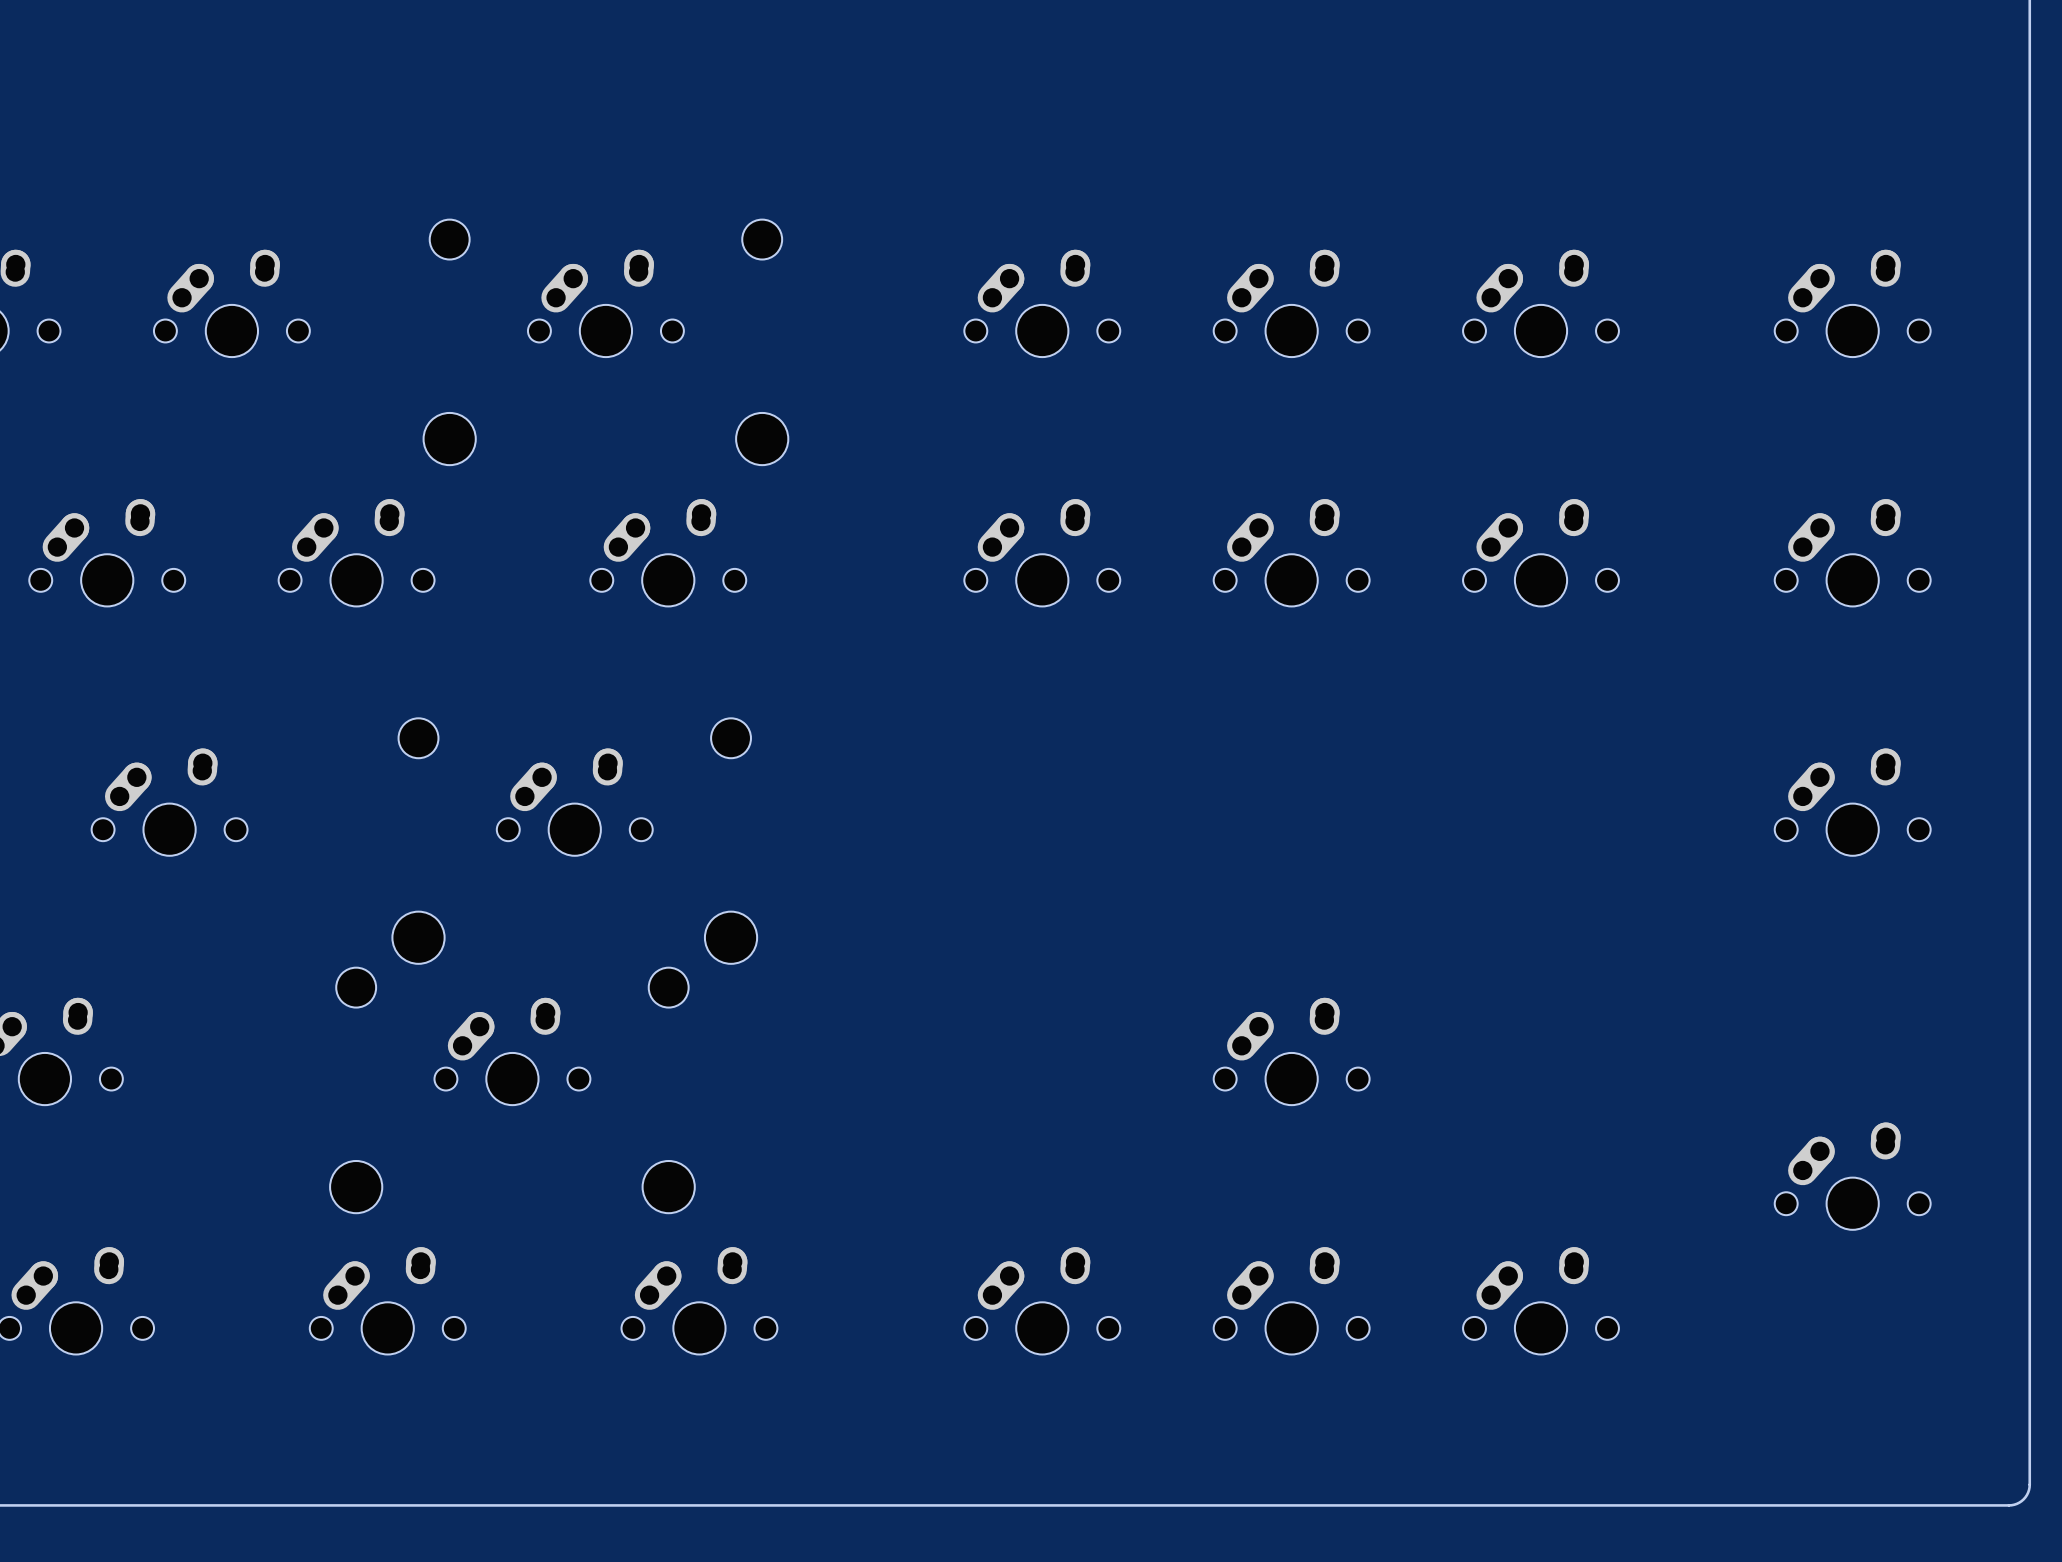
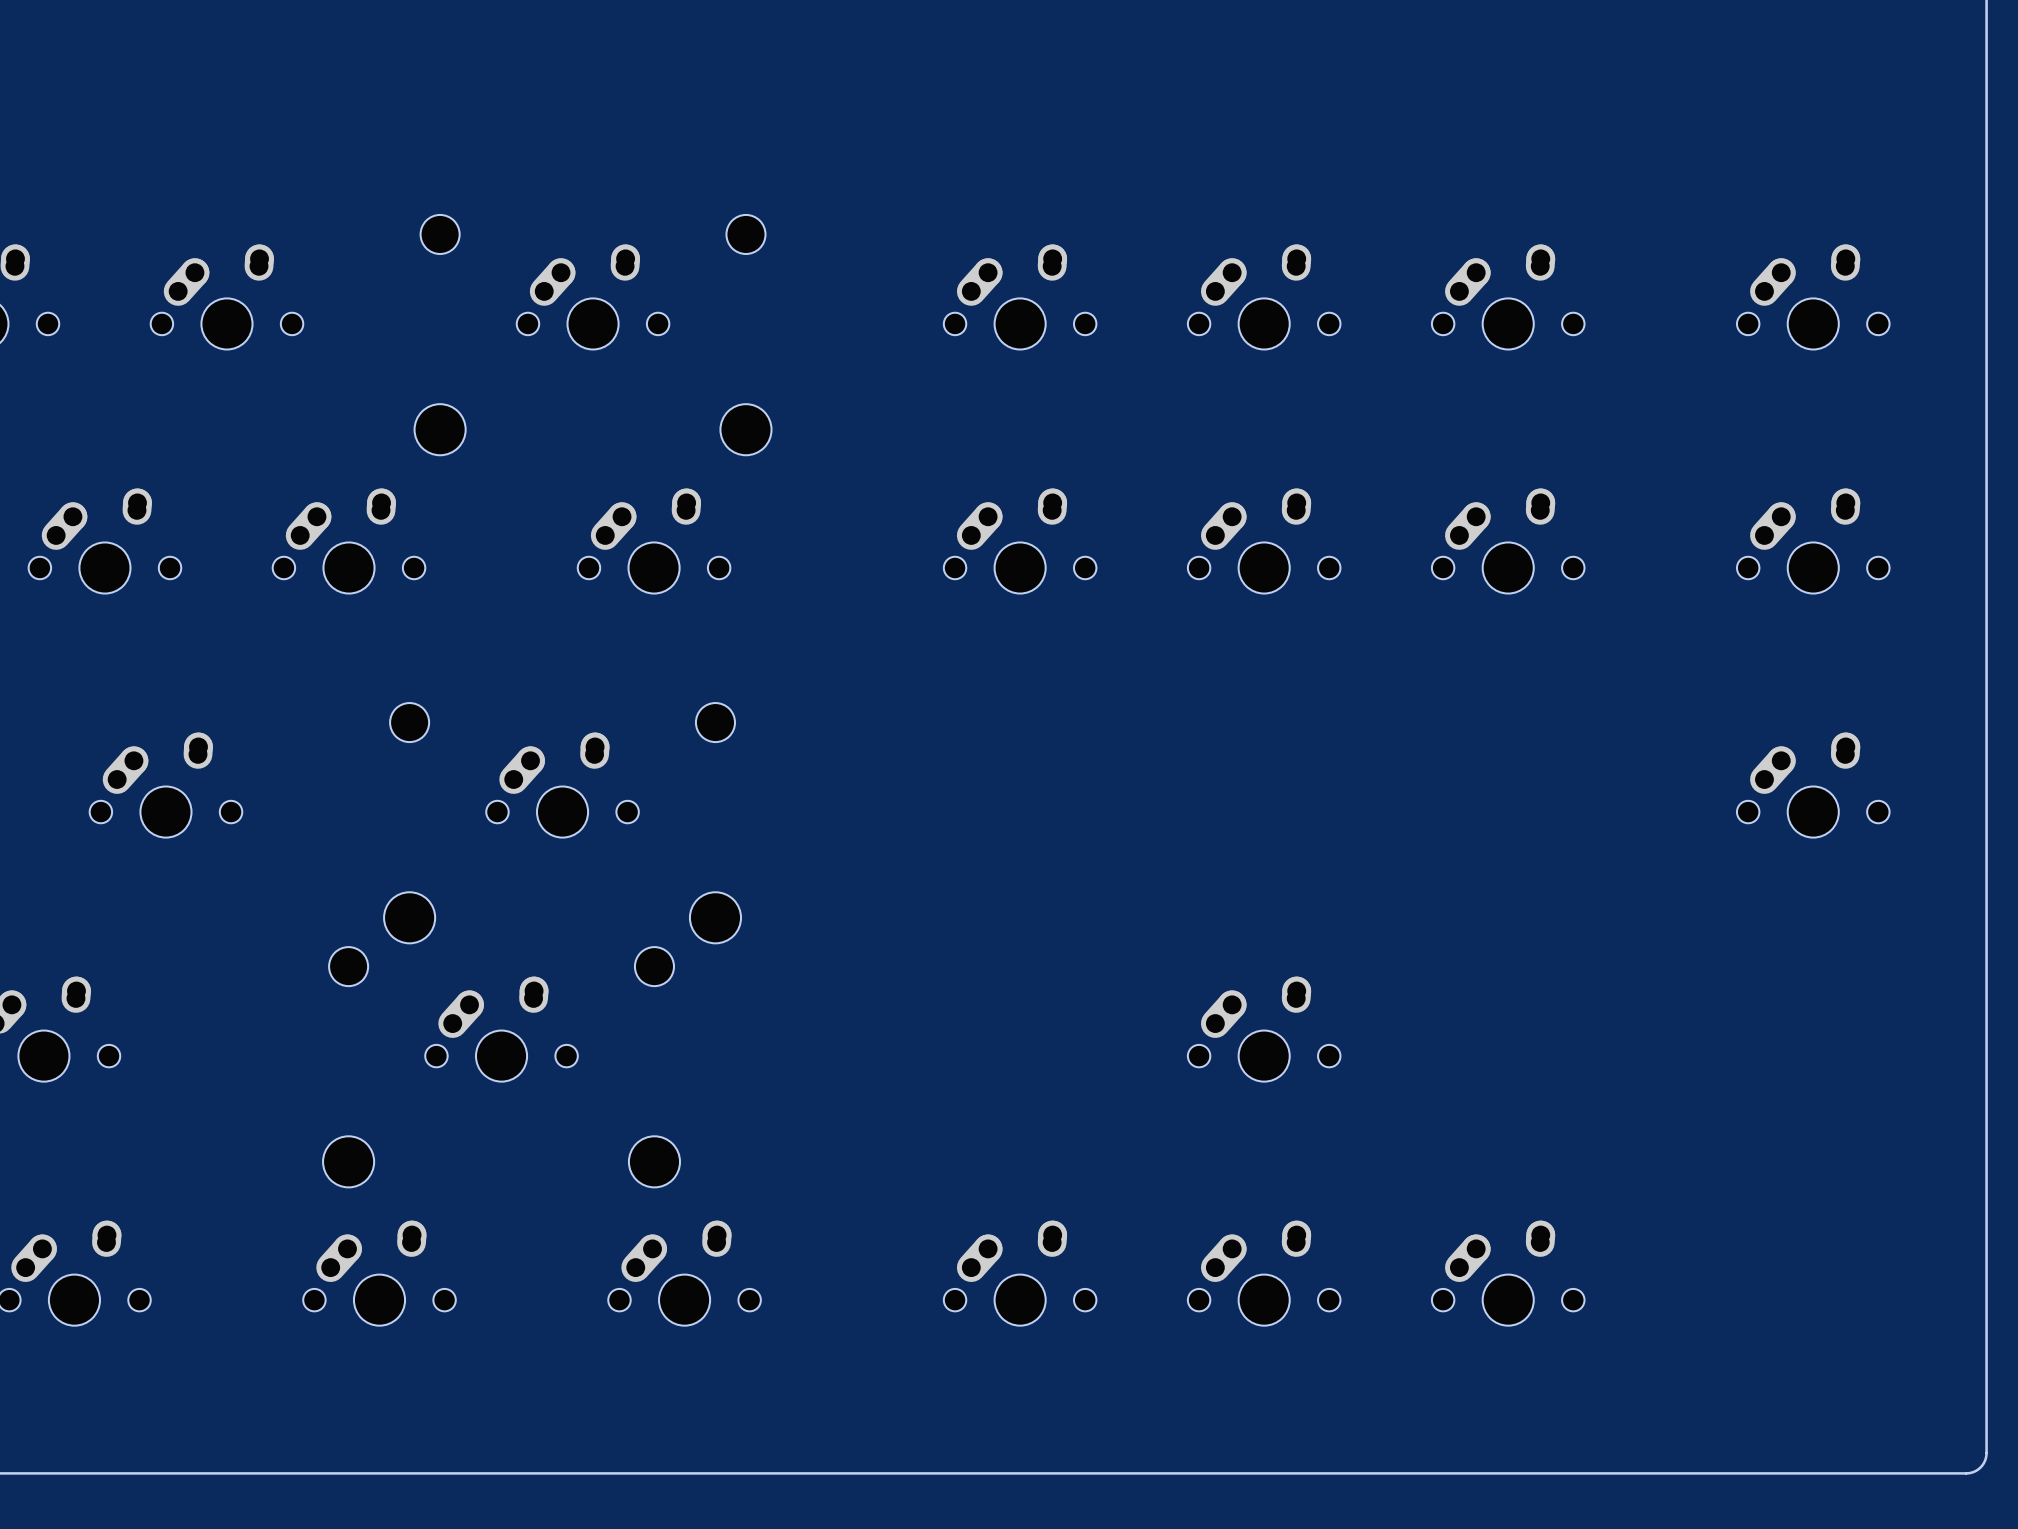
part: (1852, 1176) -> none

